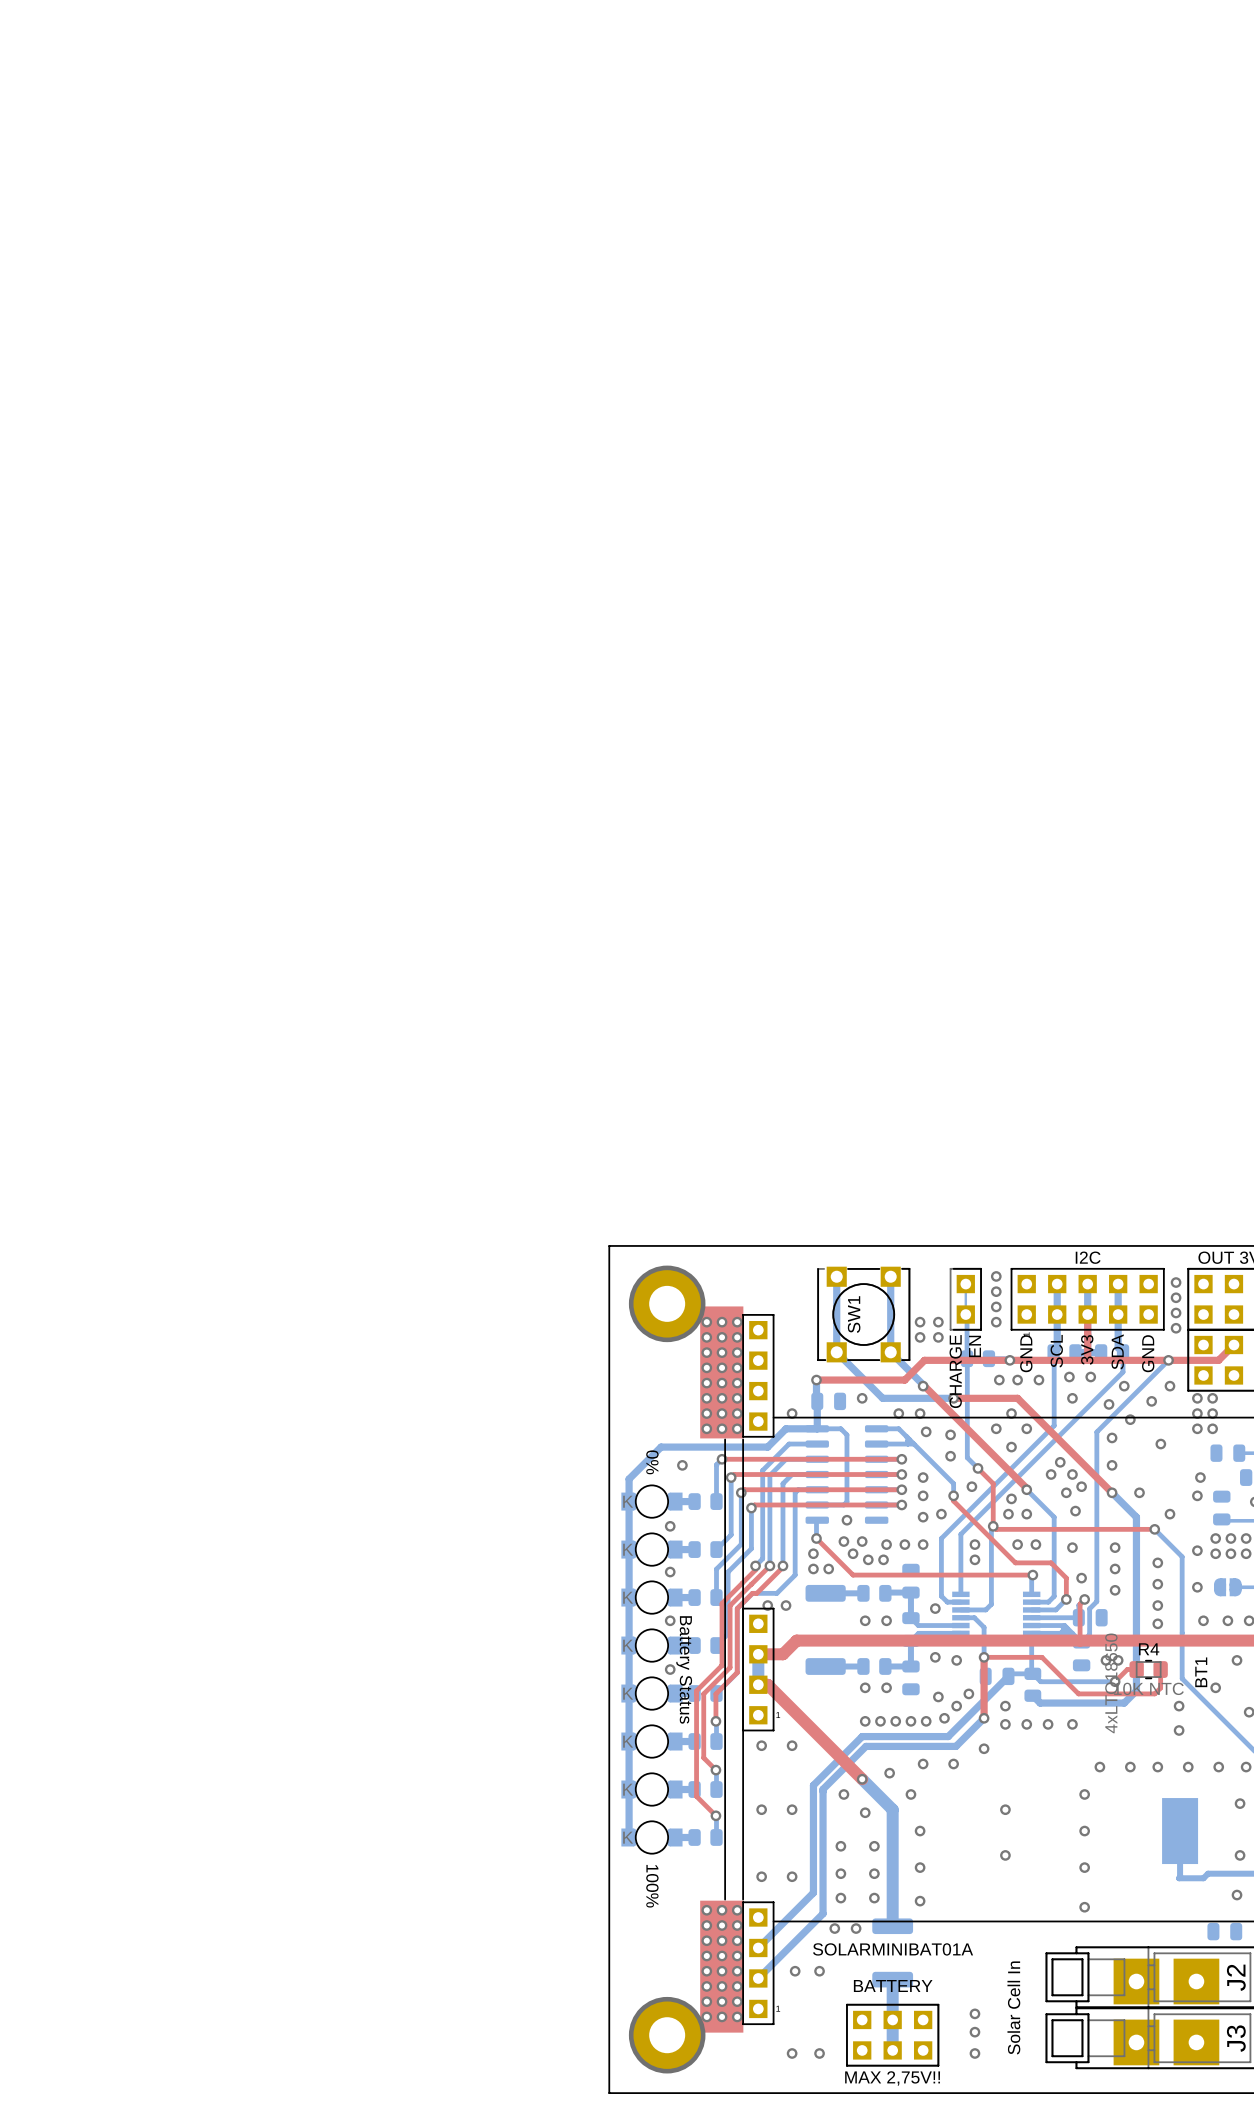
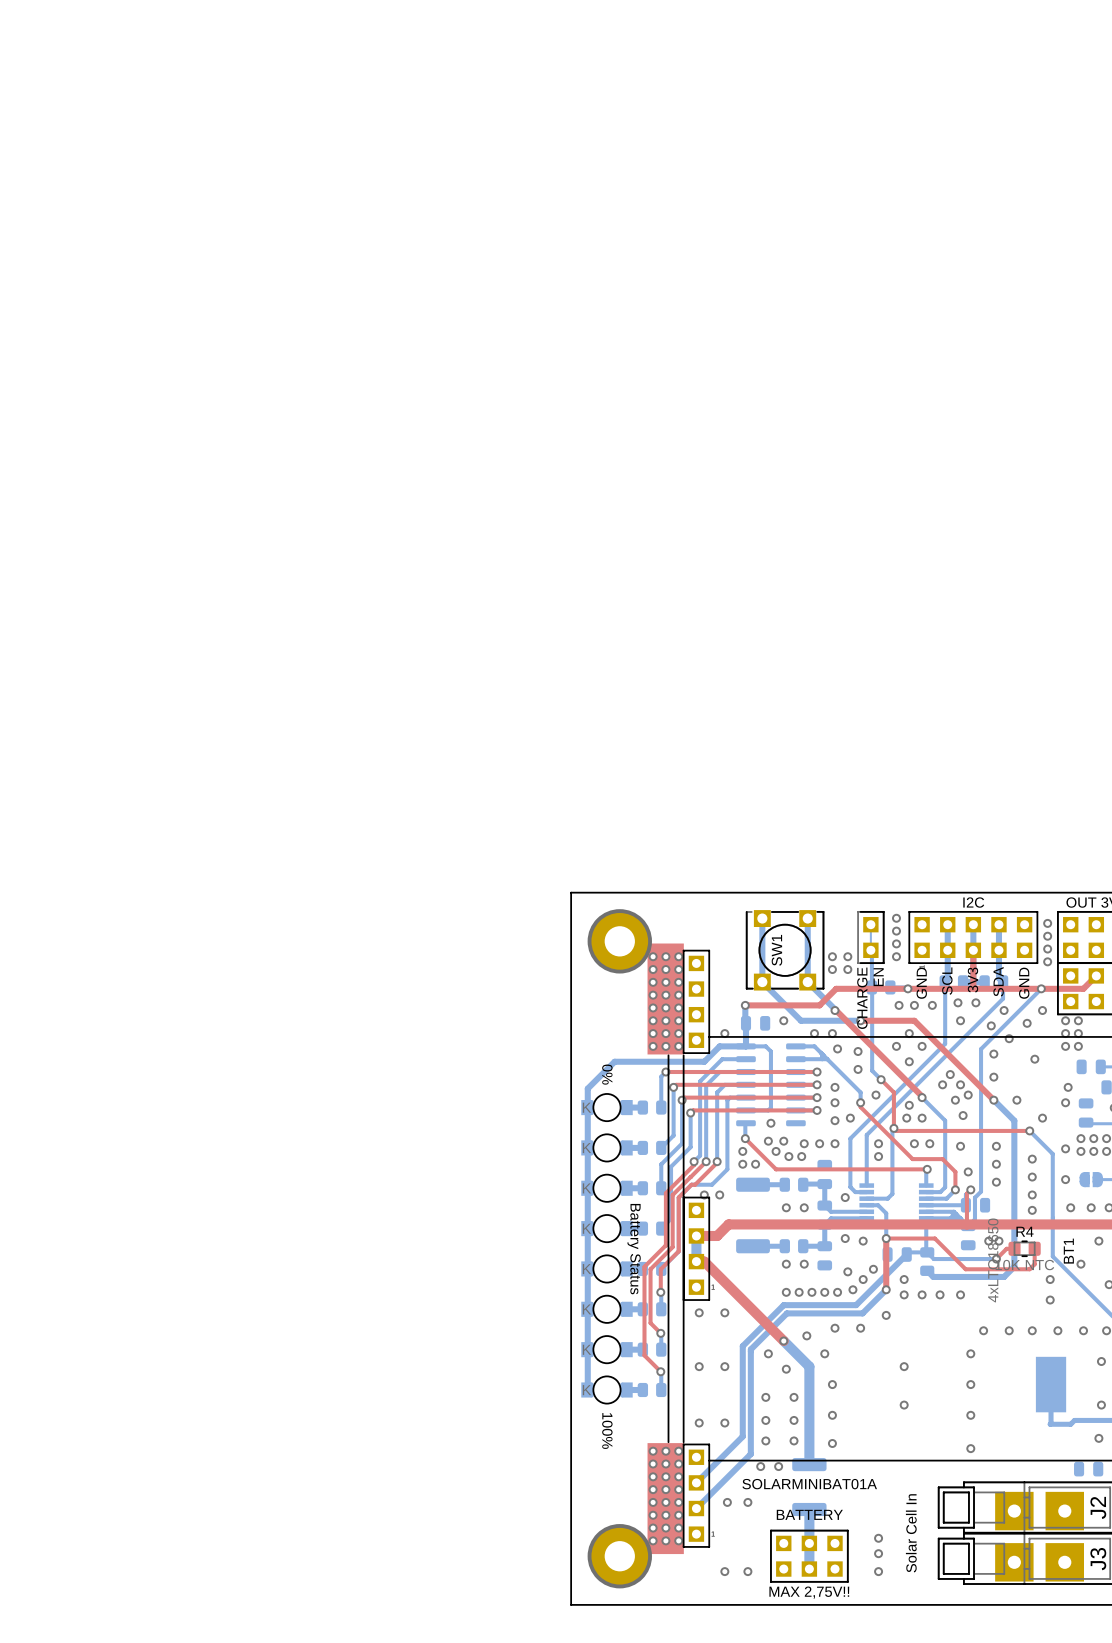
via: (682, 1465) -> none
via: (670, 1526) -> none
via: (670, 1572) -> none
via: (670, 1620) -> none
via: (670, 1669) -> none

